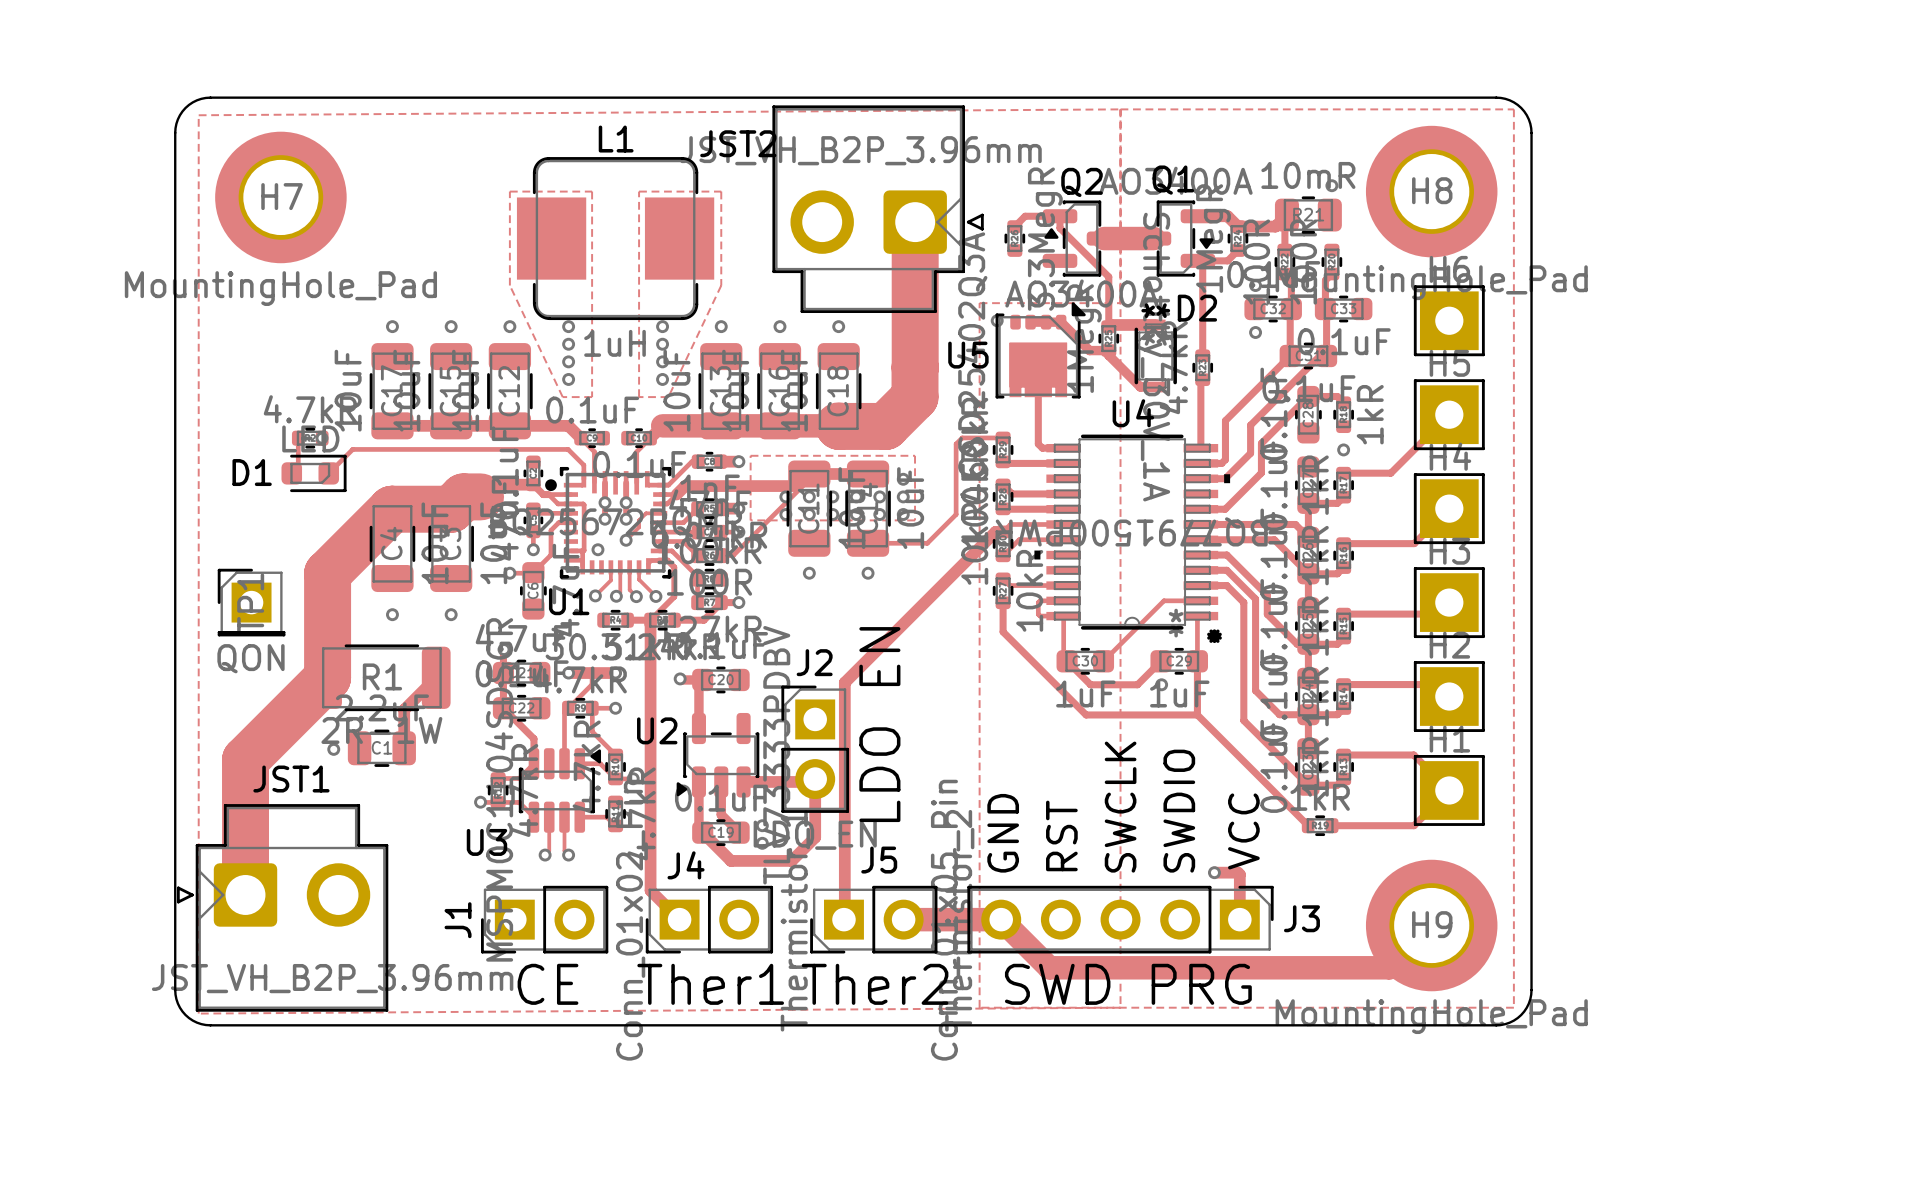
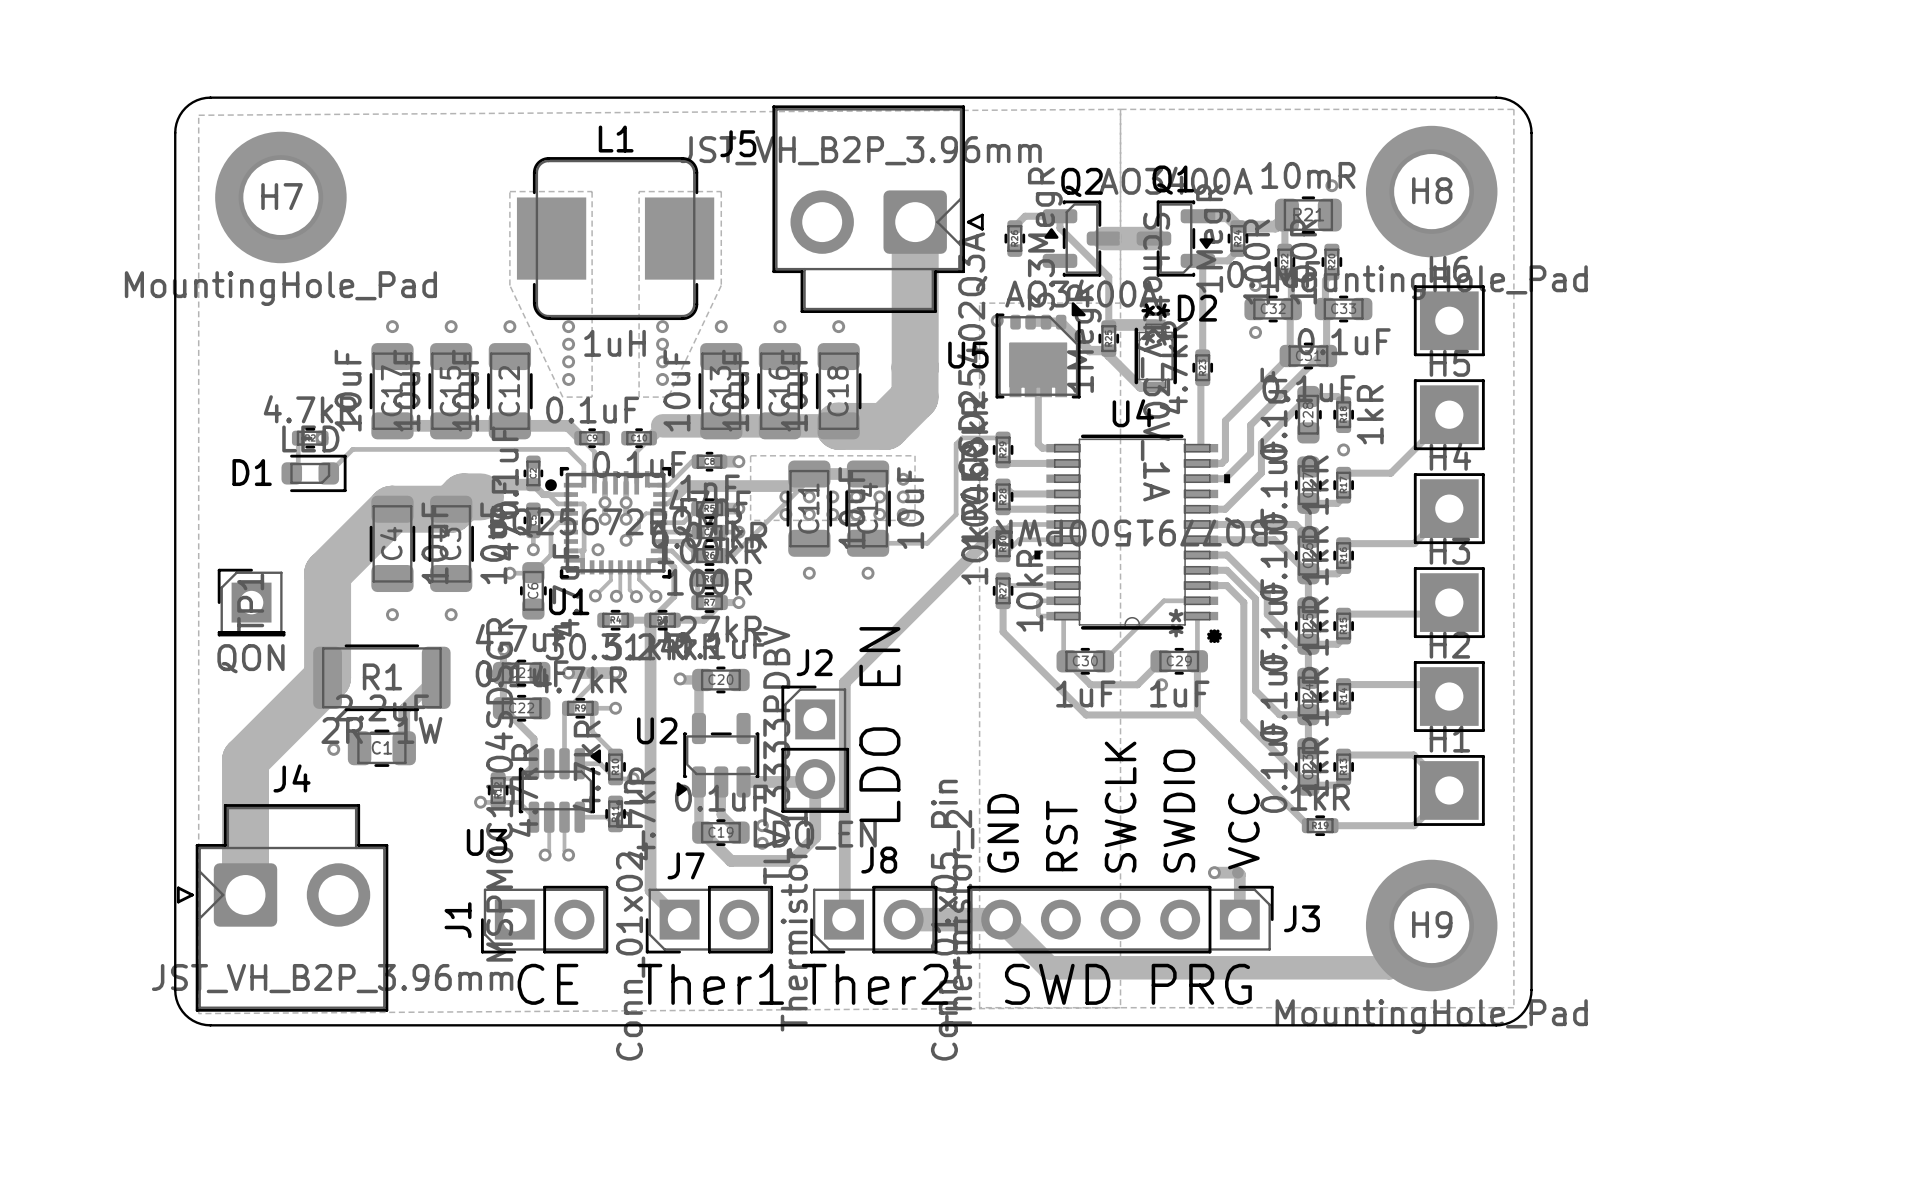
JST2 name: JST2 (738, 143) -> J5 (738, 143)
JST1 name: JST1 (291, 779) -> J4 (292, 778)
J5 name: J5 (879, 860) -> J8 (879, 860)
J4 name: J4 (686, 865) -> J7 (686, 865)

